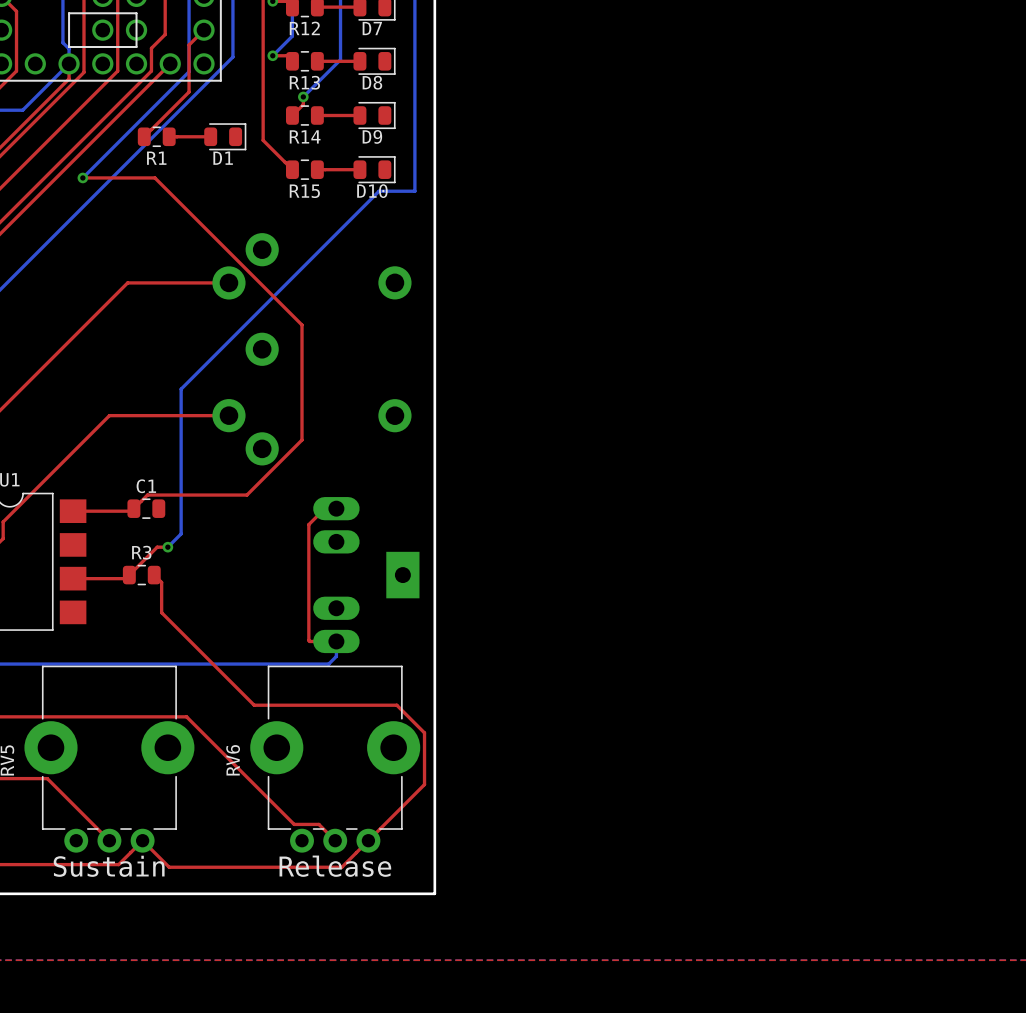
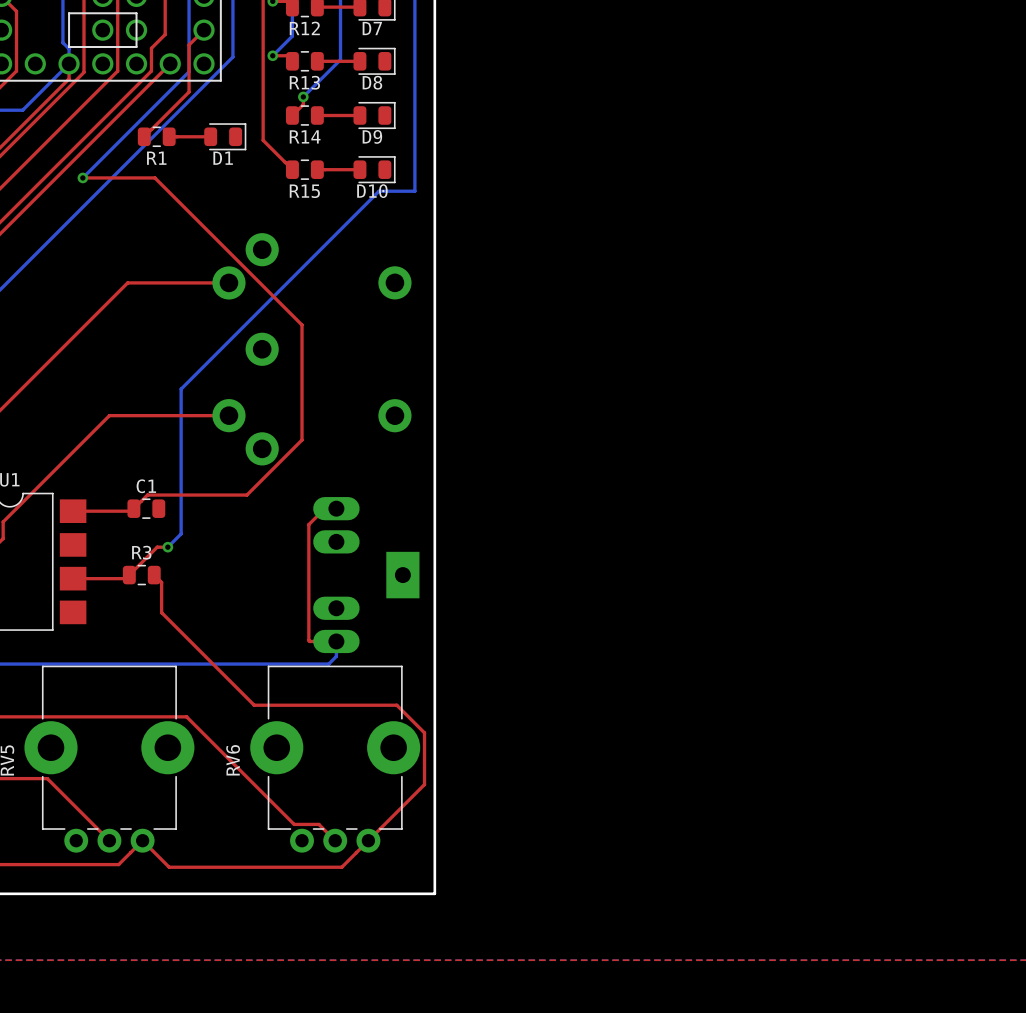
text: Sustain (109, 866) -> none
text: Release (335, 866) -> none

